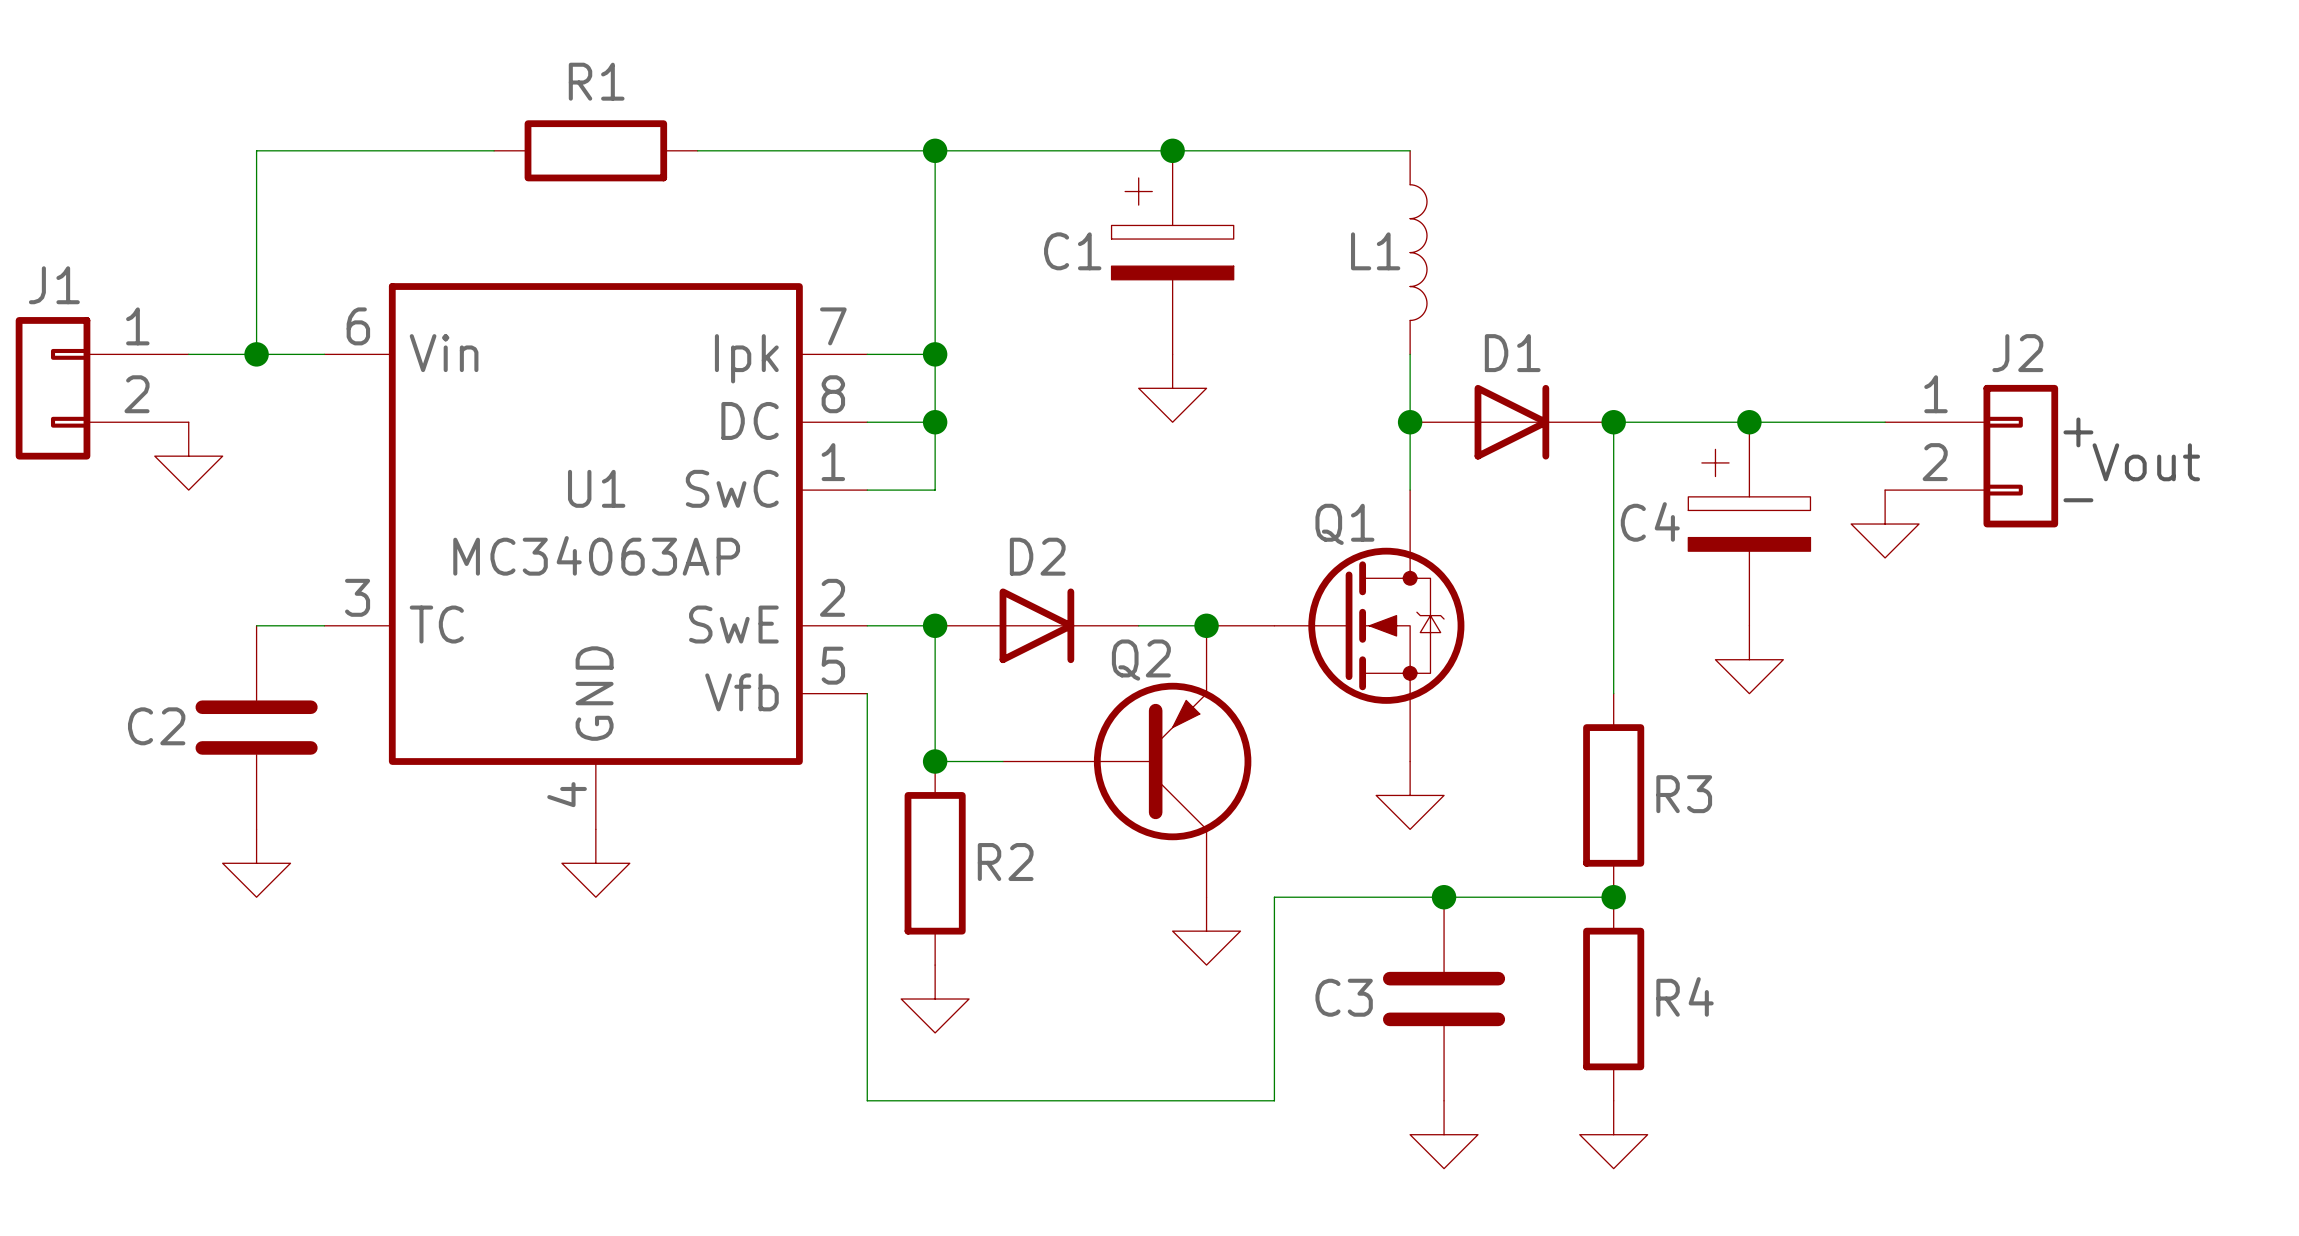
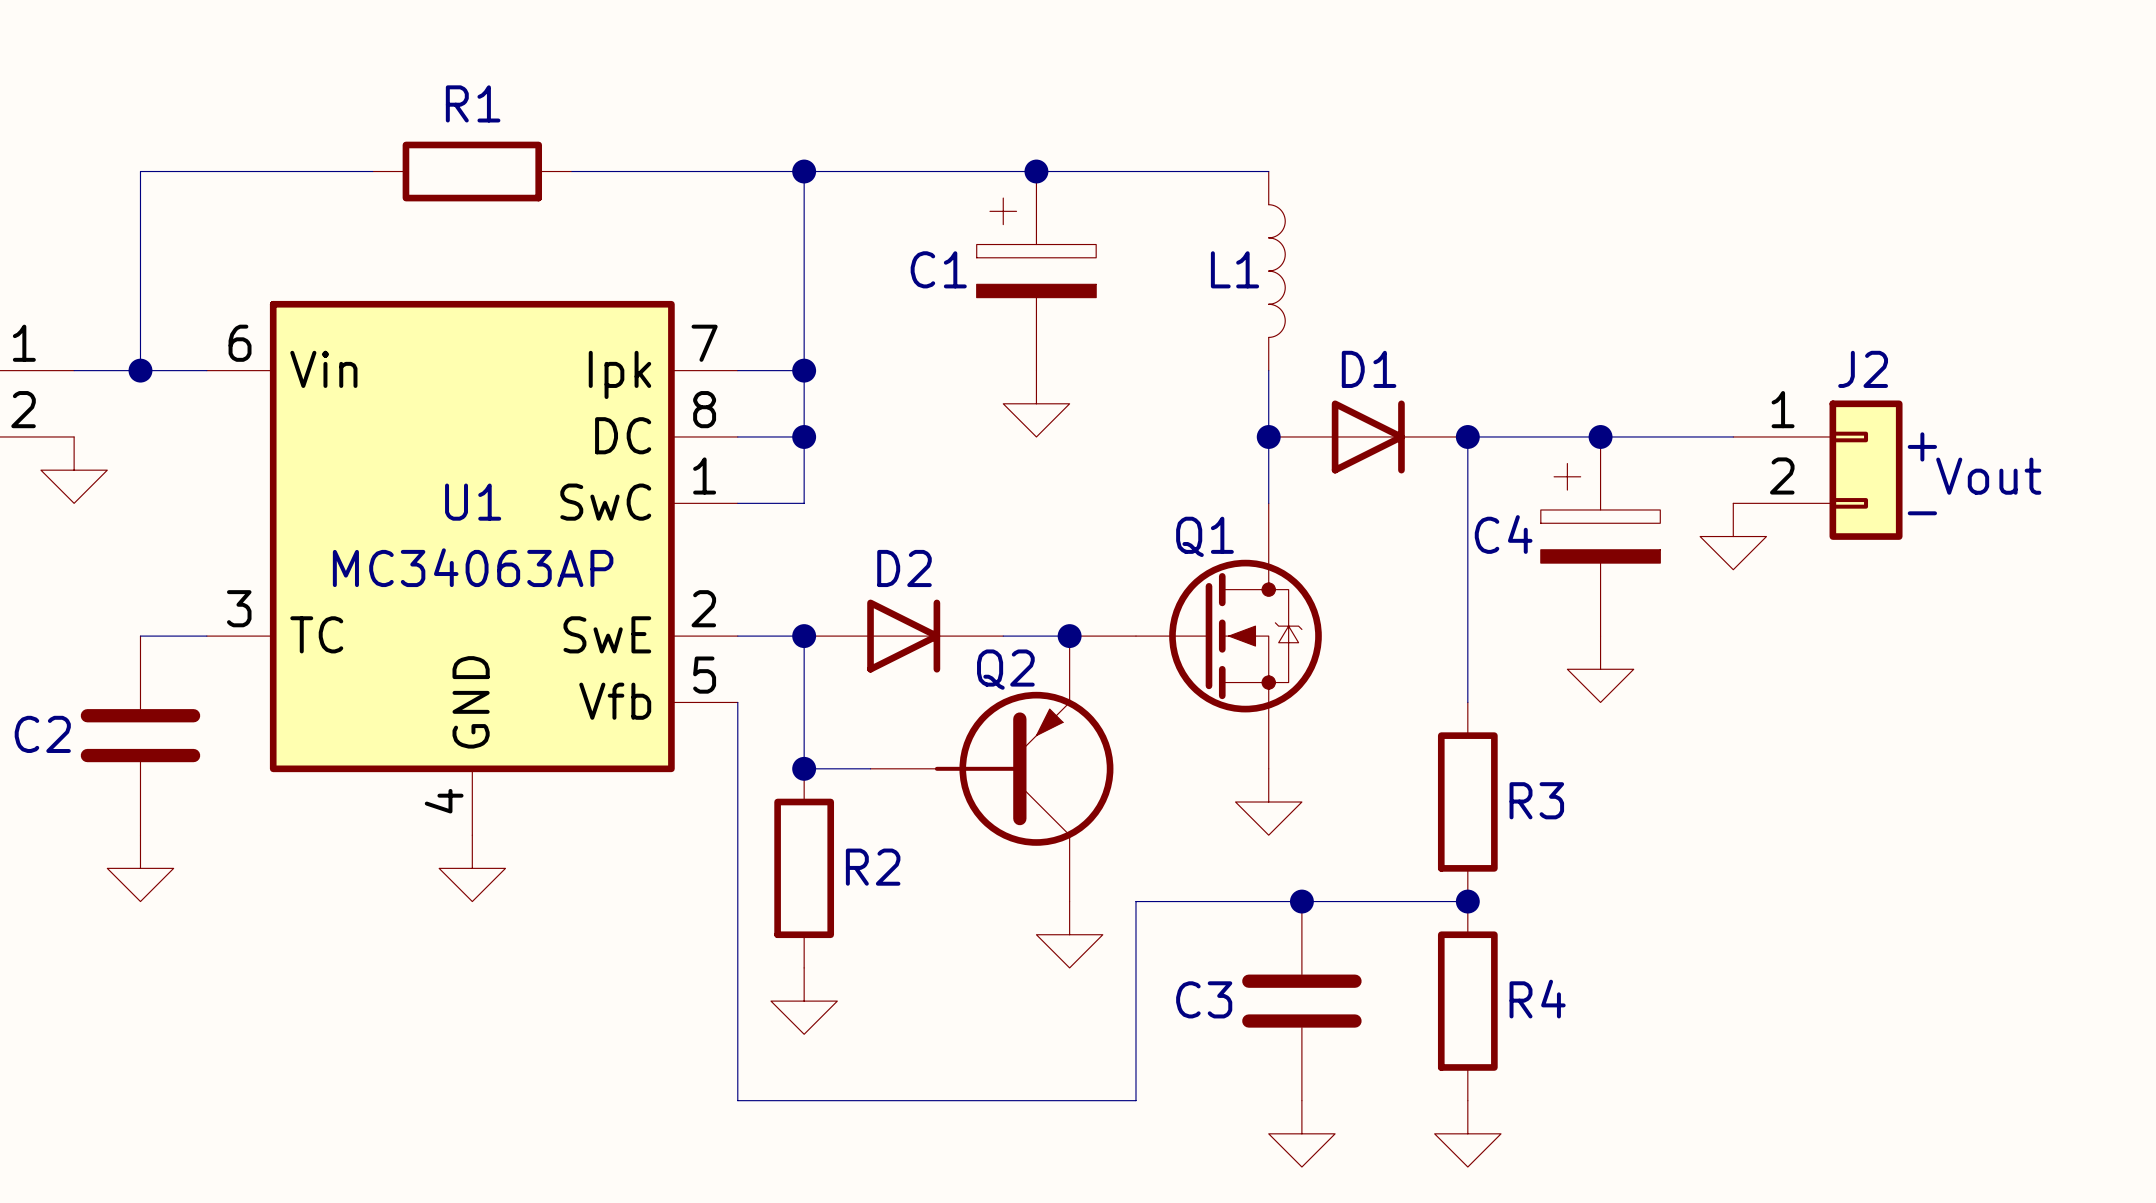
Q2 symbol: [1002, 625, 1252, 898] -> [870, 636, 1114, 902]

